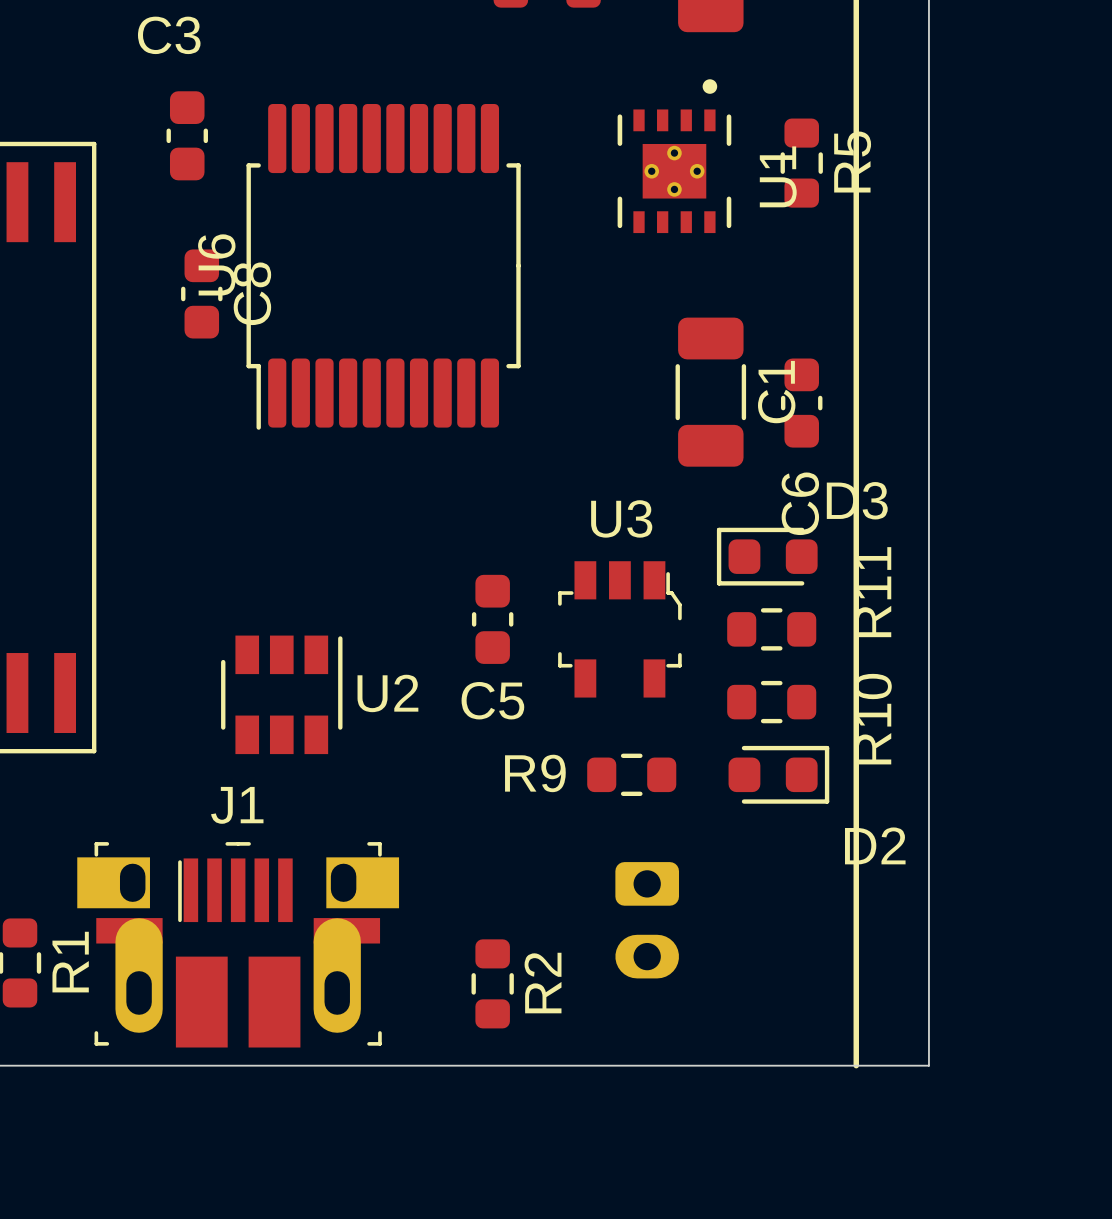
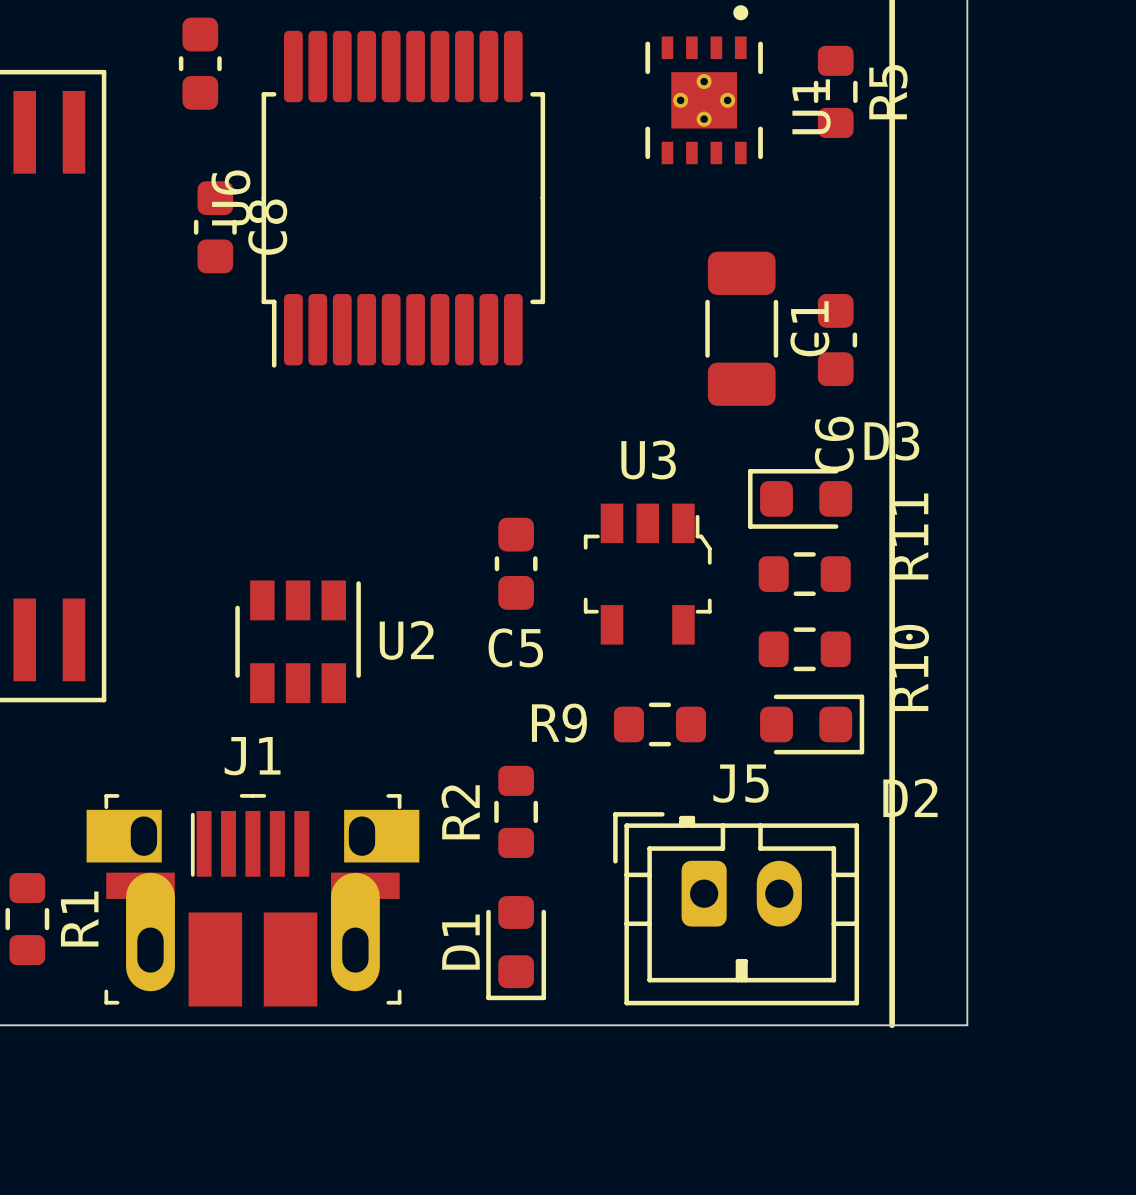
J5 side: bottom (647, 920) -> top (736, 908)
R2 position: (492, 983) -> (516, 811)
R2 name position: R2 (543, 983) -> R2 (460, 812)
D1: none -> (516, 948)

